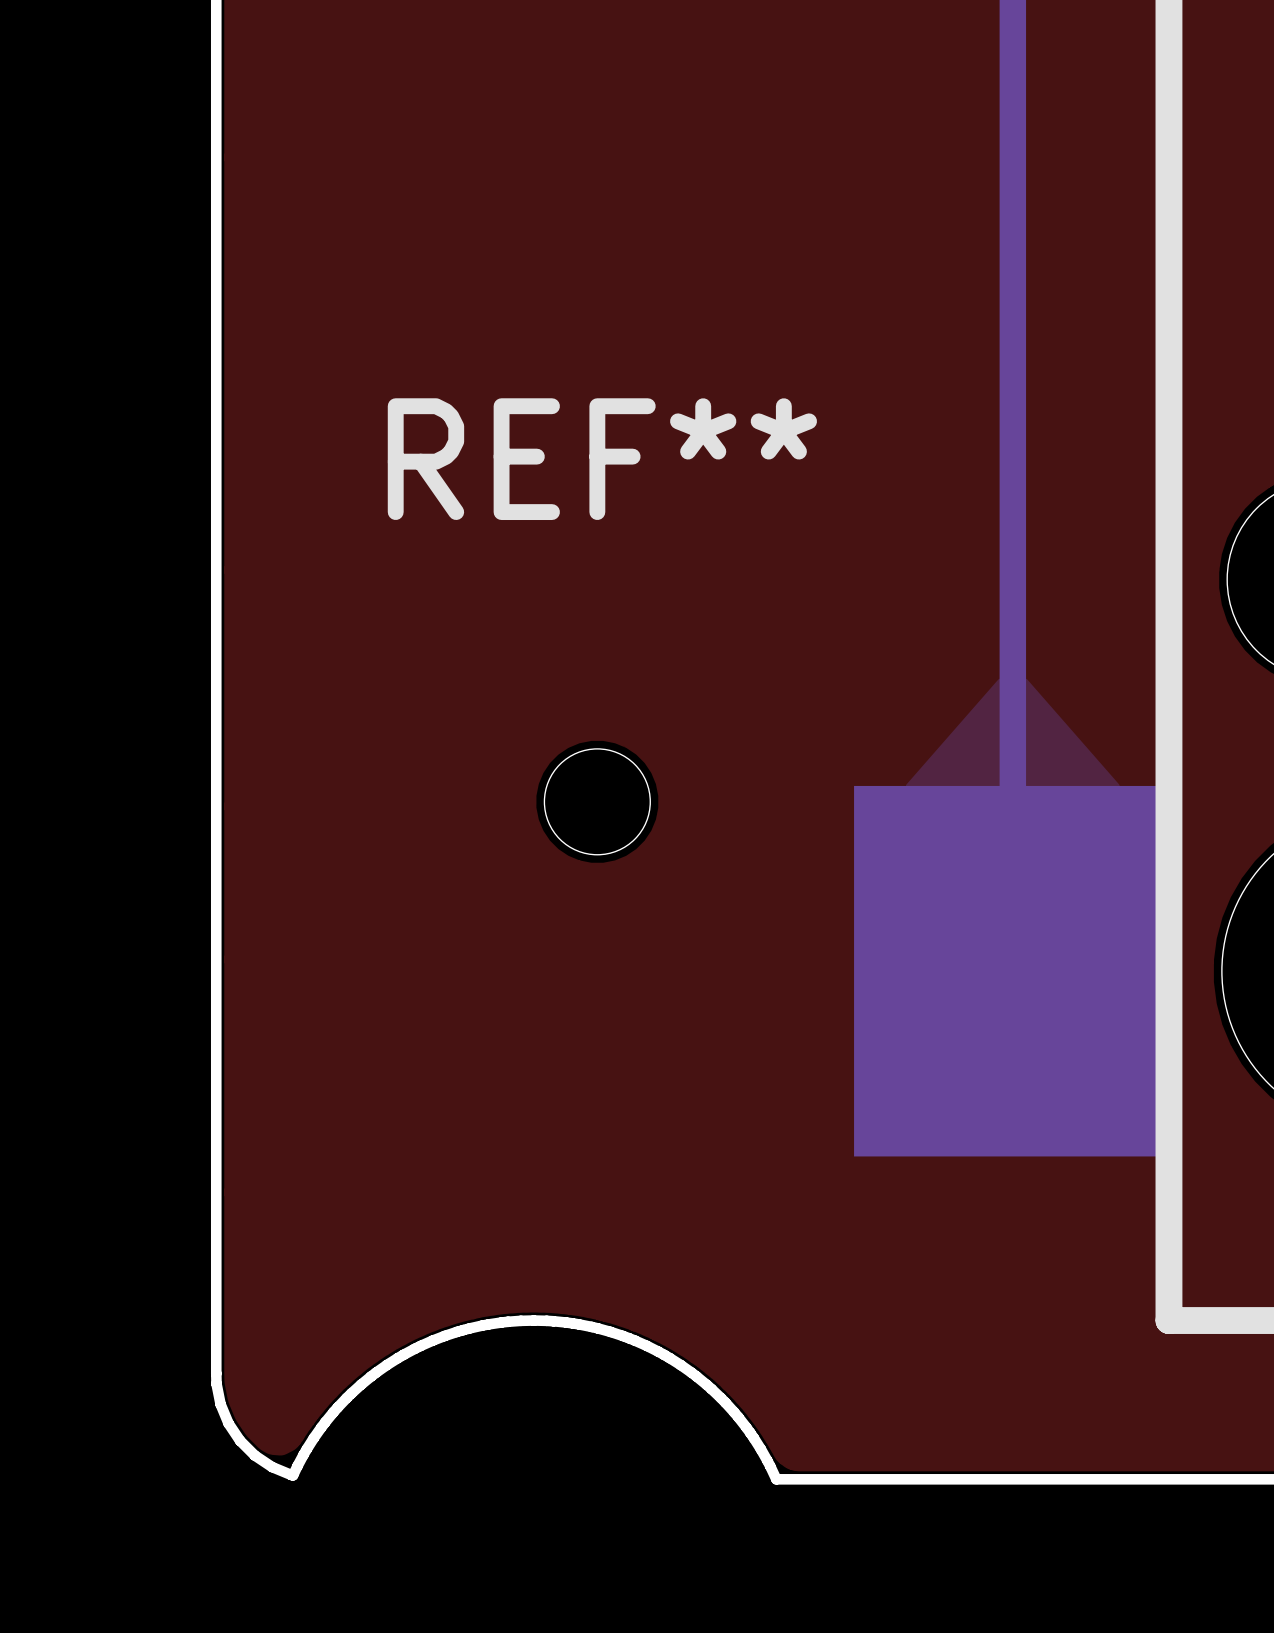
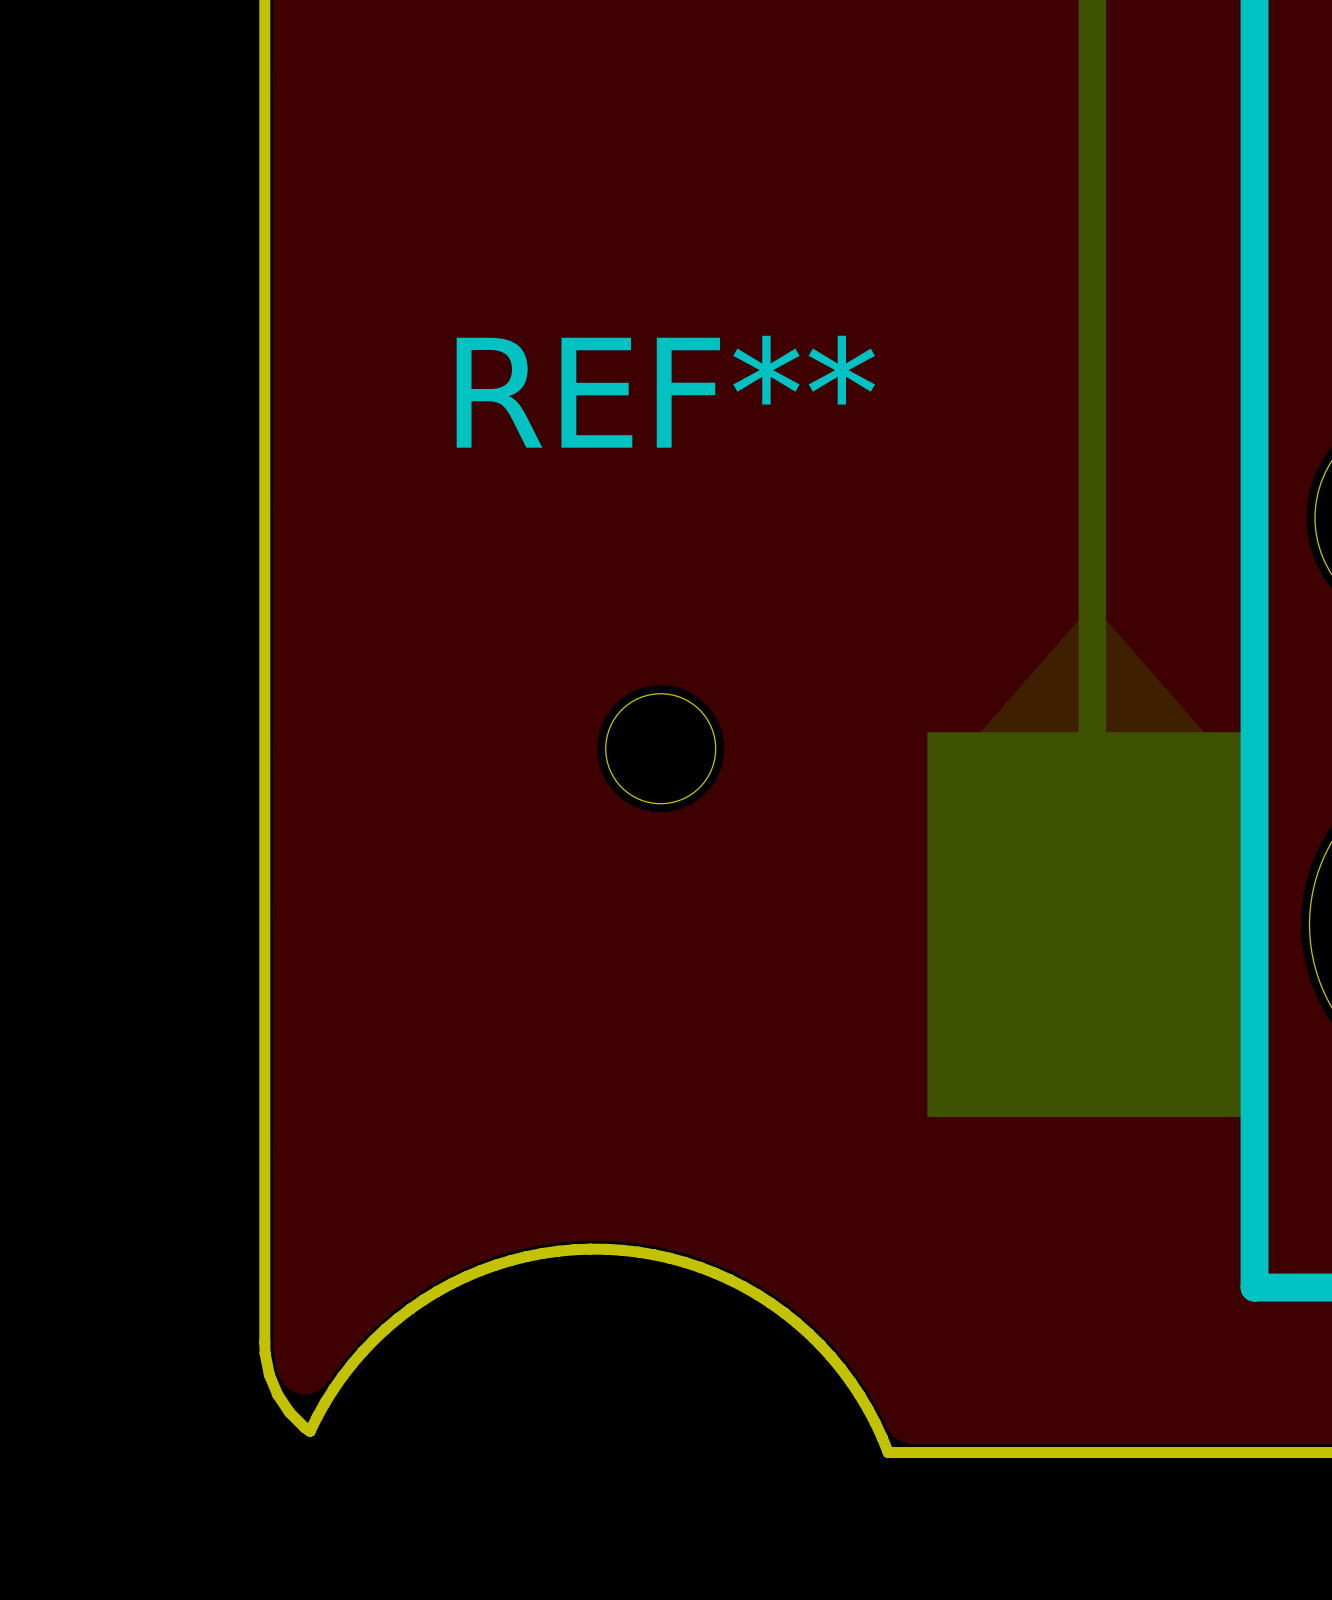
board edge: (259, 1458) (272, 1467) (291, 1474) -> none
board edge: (293, 1475) (313, 1438) (333, 1412) (360, 1384) (386, 1365) (420, 1345) (457, 1331) (501, 1322) (533, 1320) (566, 1322) (598, 1328) (635, 1340) (664, 1354) (696, 1376) (734, 1412) (760, 1449) (776, 1479) (816, 1479) -> (310, 1431) (333, 1389) (363, 1351) (397, 1318) (437, 1291) (480, 1270) (526, 1256) (558, 1251) (606, 1249) (653, 1254) (700, 1267) (744, 1286) (771, 1303) (808, 1333) (841, 1369) (867, 1408) (888, 1452)

